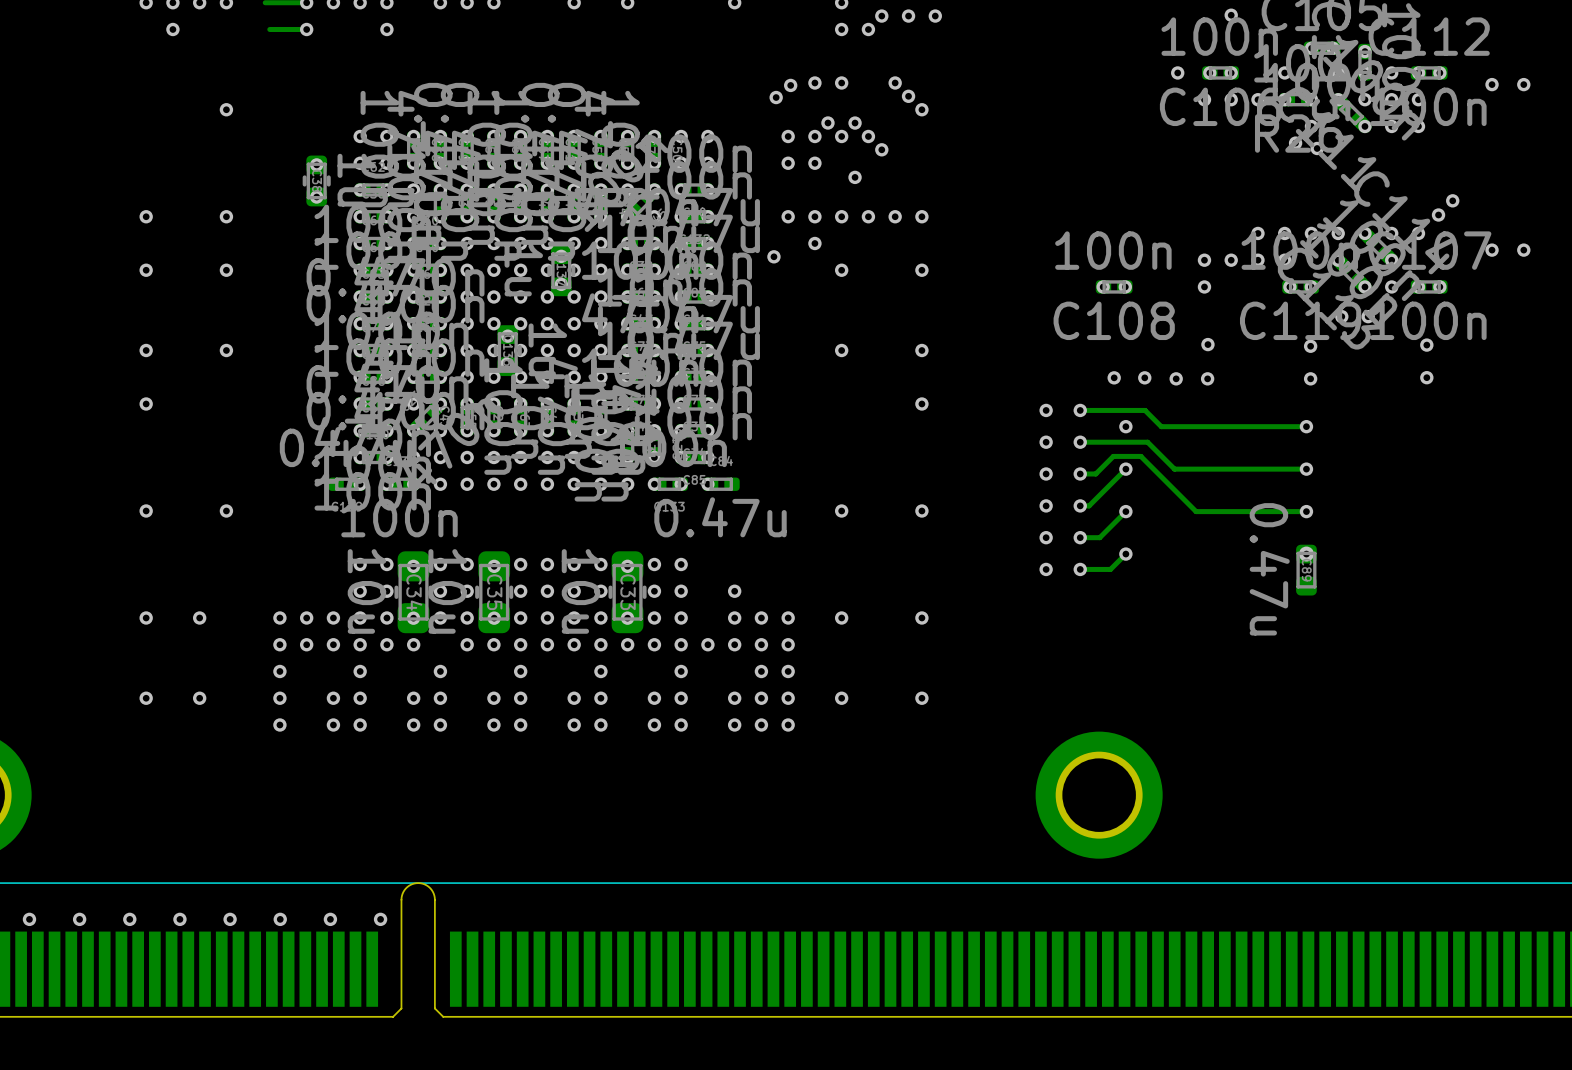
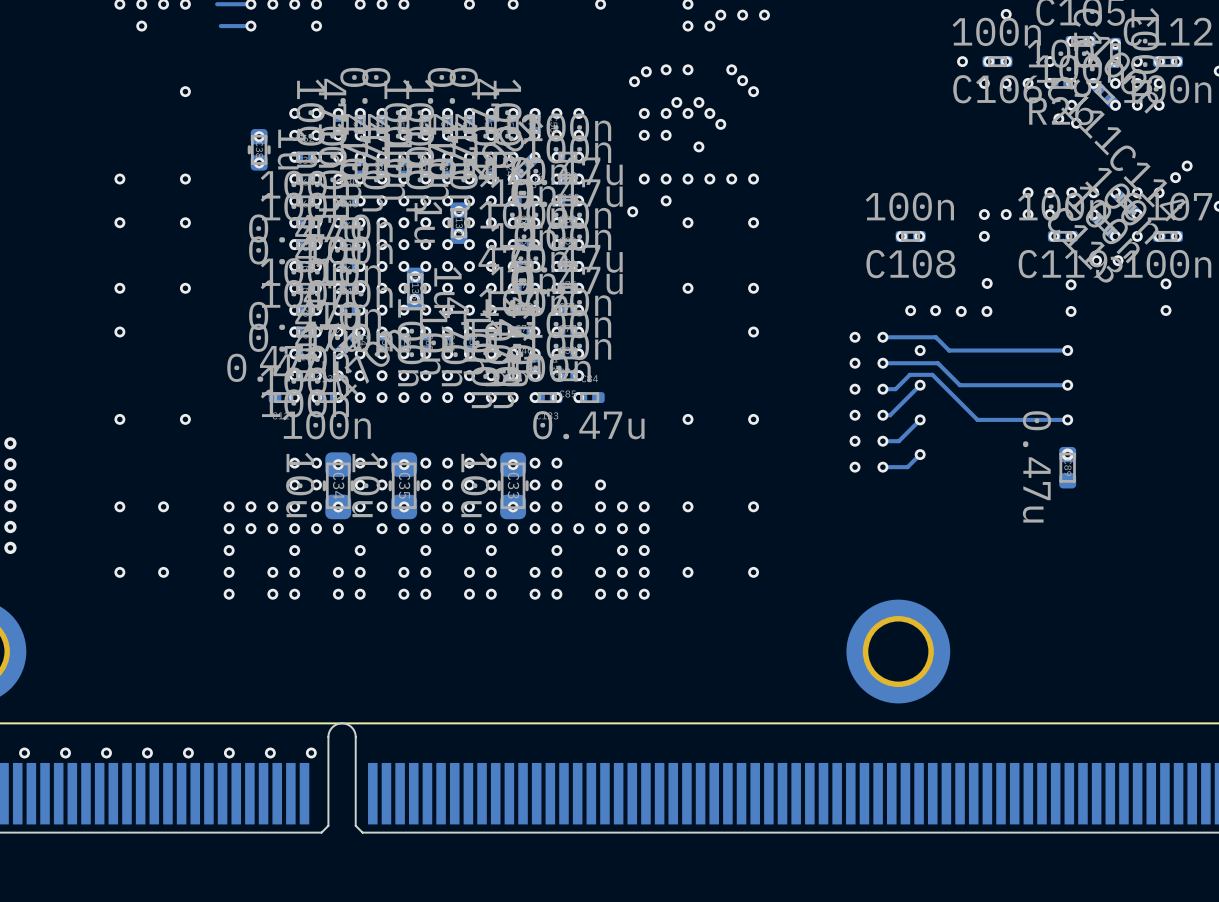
via: none -> (10, 443)
via: none -> (10, 464)
via: none -> (10, 485)
via: none -> (10, 506)
via: none -> (10, 526)
via: none -> (10, 547)

